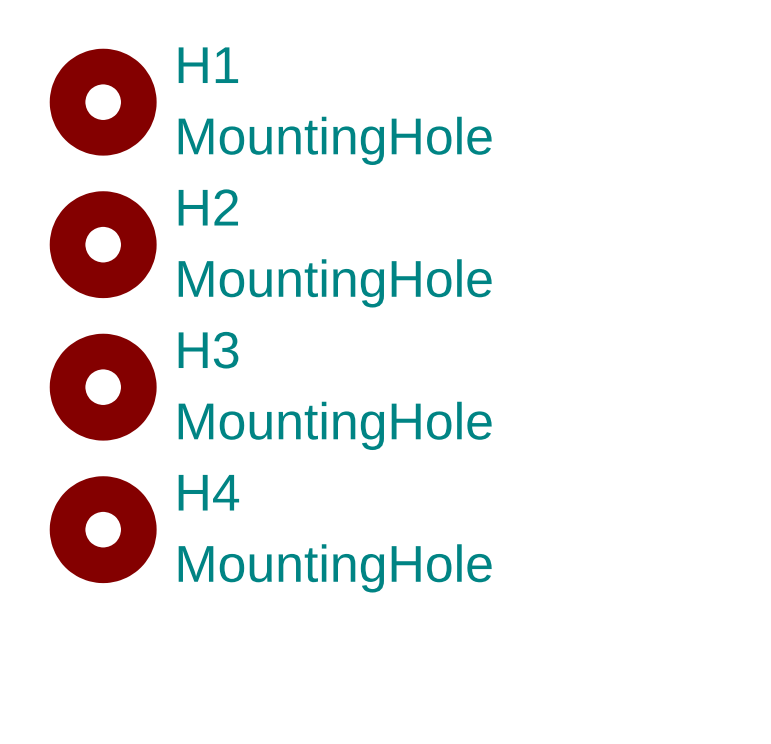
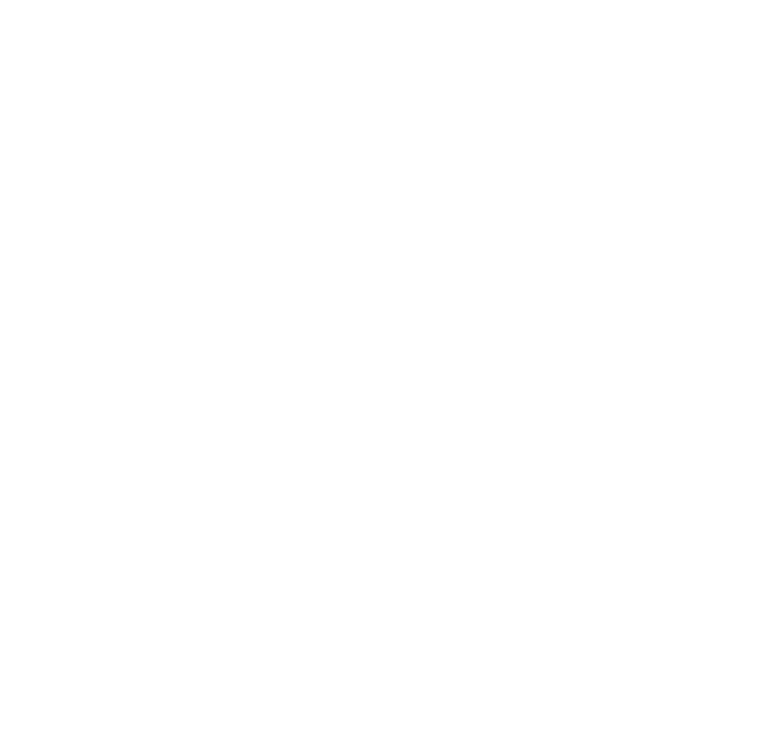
H1: MountingHole (103, 102) -> none
H2: MountingHole (103, 244) -> none
H3: MountingHole (103, 387) -> none
H4: MountingHole (103, 529) -> none

